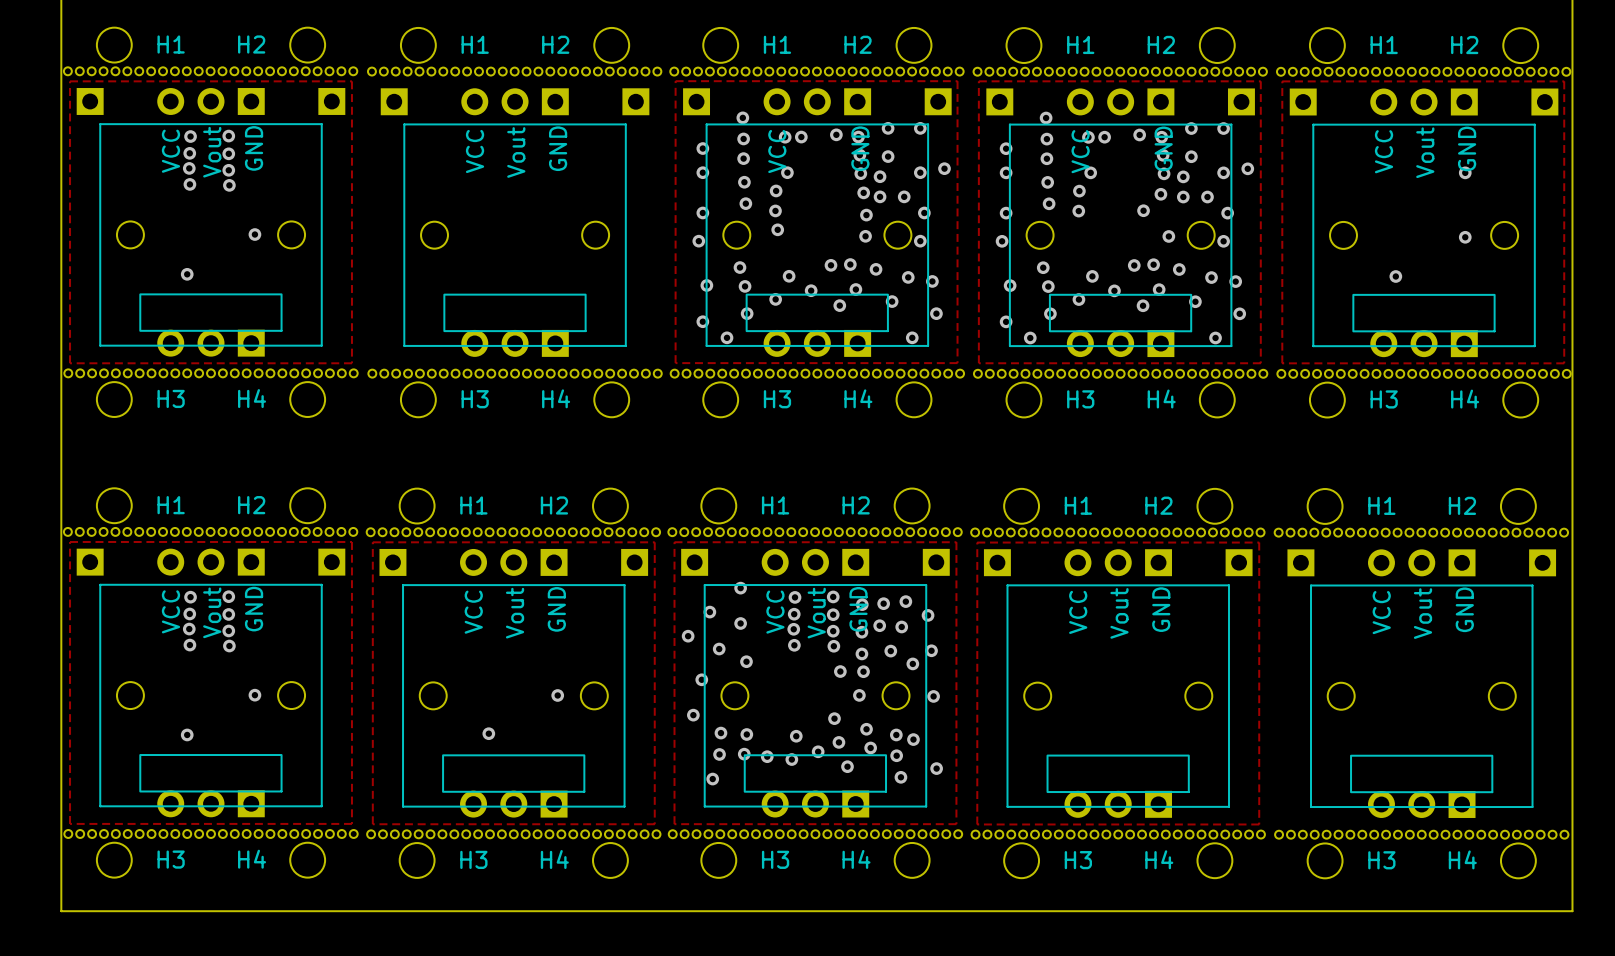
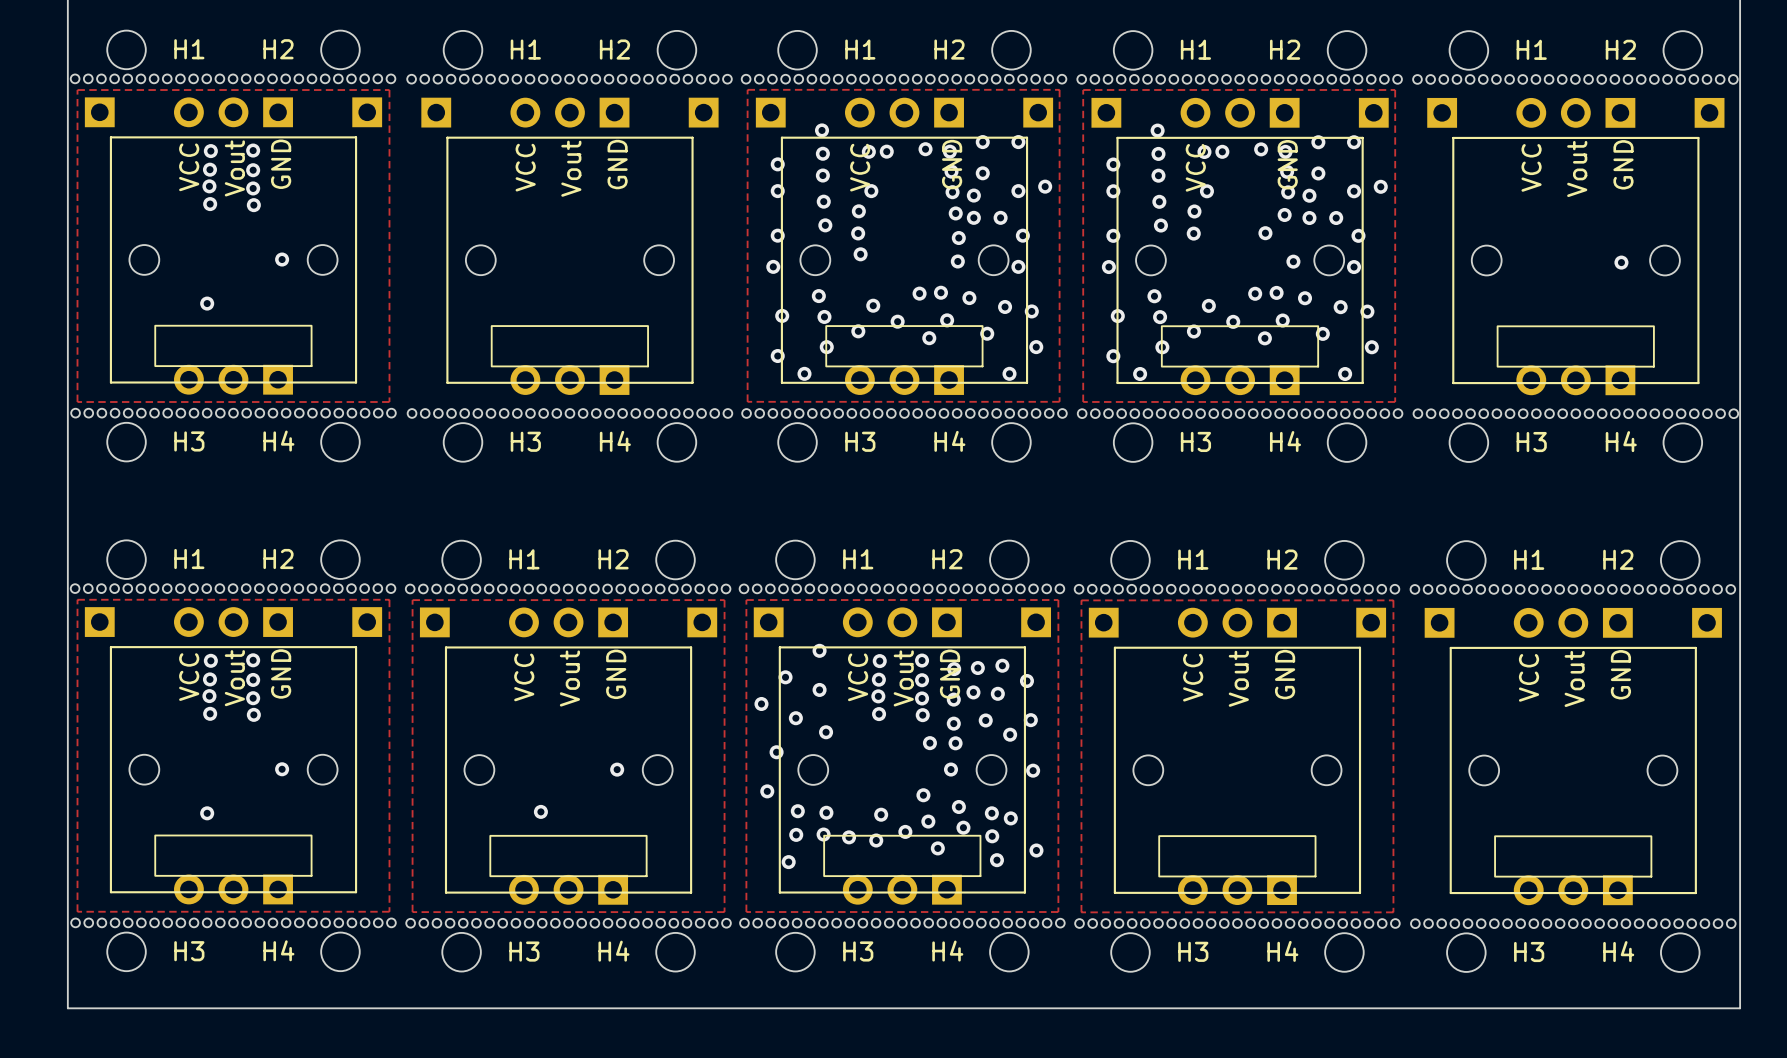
zone outline: (1282, 81) (1564, 81) (1564, 363) (1282, 363) (1282, 81) -> none
via: (1465, 172) -> none
via: (1395, 276) -> none

